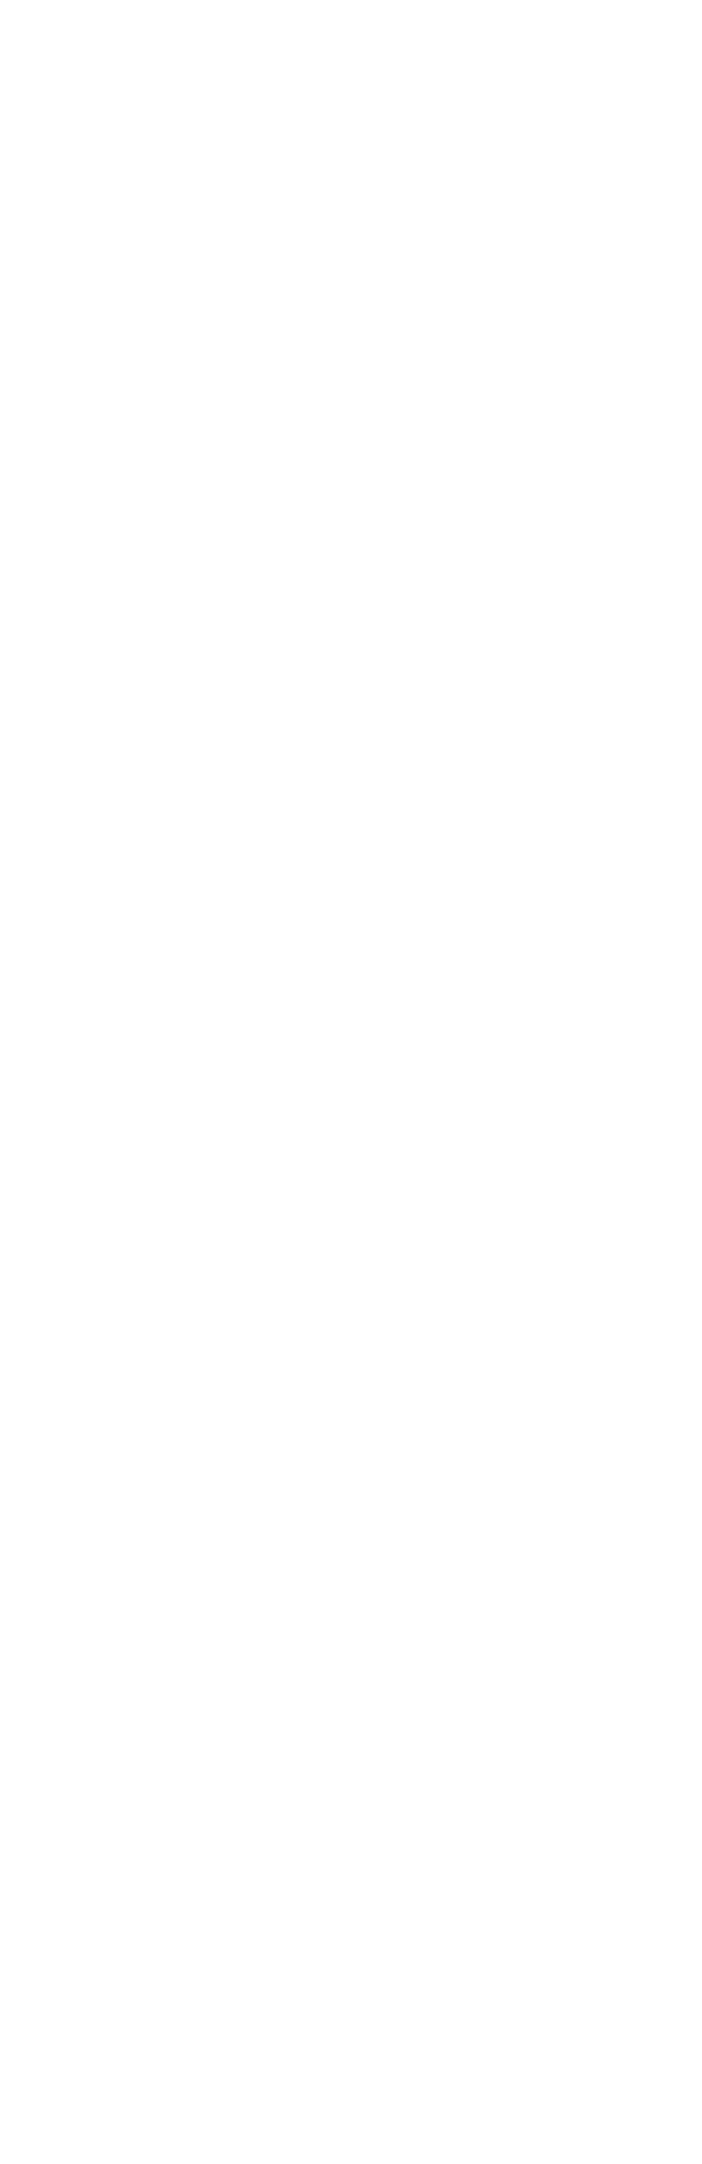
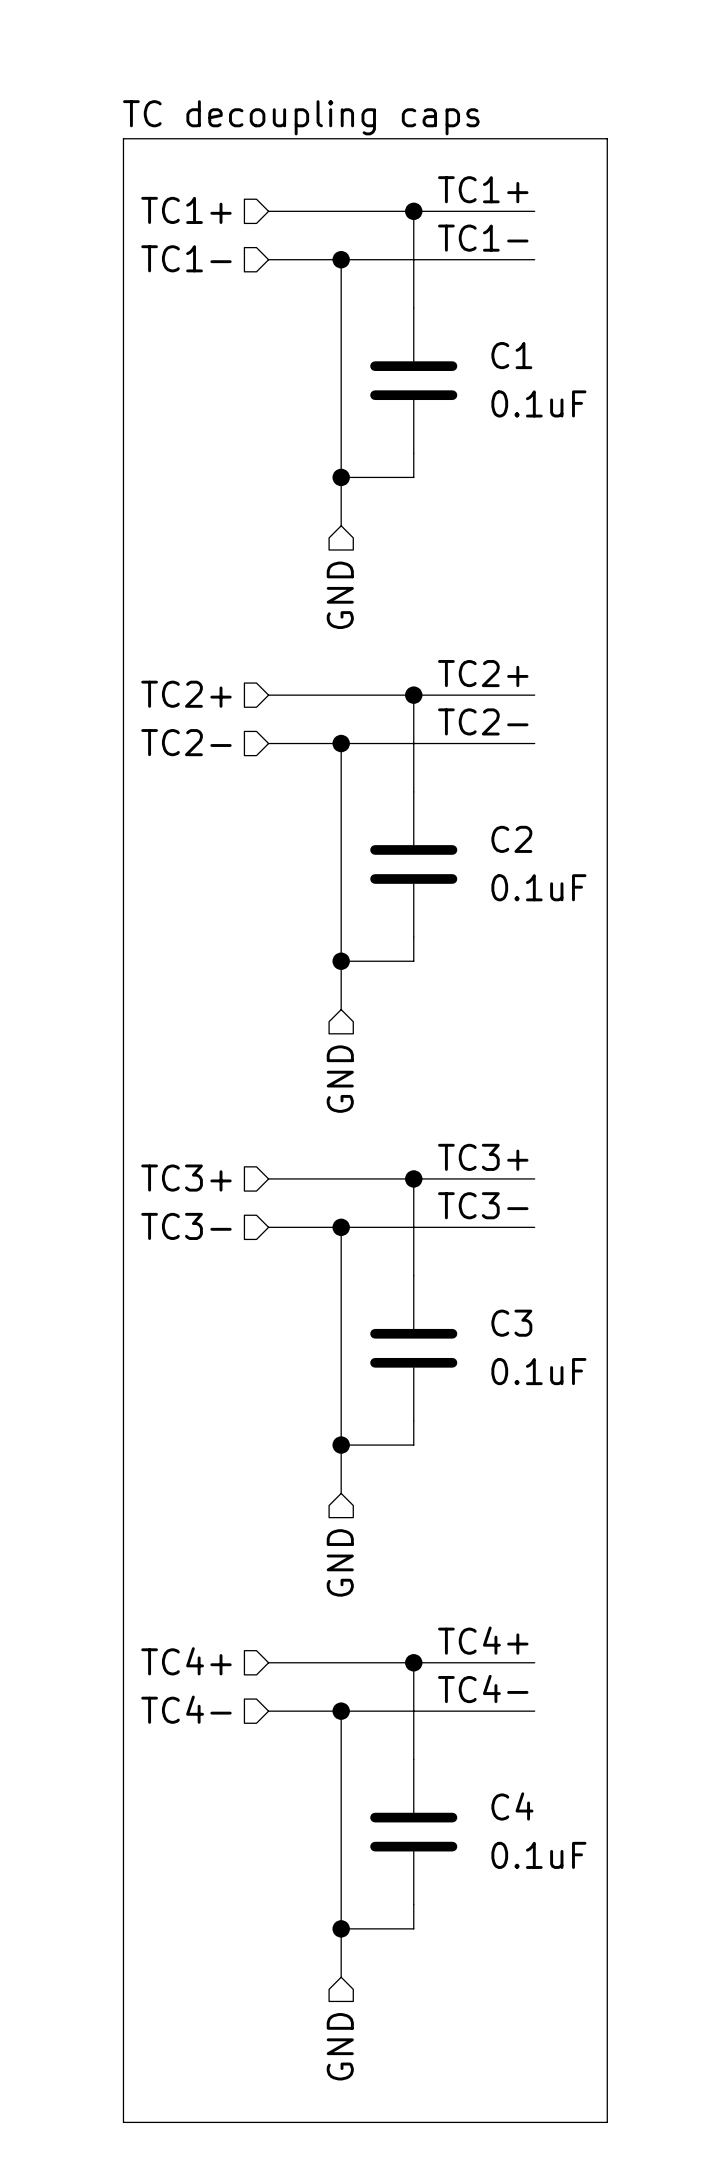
text: none -> TC decoupling caps (301, 117)
line: none -> (123, 138) (607, 138) (607, 2122) (123, 2122) (123, 138)
label: none -> TC1+ (483, 189)
hierarchical label: none -> TC1+ (186, 210)
wire: none -> (268, 211) (534, 211)
wire: none -> (413, 211) (413, 308)
junction: none -> (413, 211)
label: none -> TC1- (483, 238)
hierarchical label: none -> TC1- (186, 258)
wire: none -> (268, 259) (534, 259)
wire: none -> (341, 259) (341, 525)
junction: none -> (341, 259)
C1: none -> 0.1uF (413, 380)
wire: none -> (413, 453) (413, 477) (341, 477)
junction: none -> (341, 477)
hierarchical label: none -> GND (340, 595)
label: none -> TC2+ (483, 673)
hierarchical label: none -> TC2+ (186, 694)
wire: none -> (268, 695) (534, 695)
wire: none -> (413, 695) (413, 791)
junction: none -> (413, 695)
label: none -> TC2- (483, 721)
hierarchical label: none -> TC2- (186, 742)
wire: none -> (268, 743) (534, 743)
wire: none -> (341, 743) (341, 1009)
junction: none -> (341, 743)
C2: none -> 0.1uF (413, 864)
wire: none -> (413, 937) (413, 961) (341, 961)
junction: none -> (341, 961)
hierarchical label: none -> GND (340, 1079)
label: none -> TC3+ (483, 1157)
hierarchical label: none -> TC3+ (186, 1178)
wire: none -> (268, 1178) (534, 1178)
wire: none -> (413, 1178) (413, 1275)
junction: none -> (413, 1178)
label: none -> TC3- (483, 1205)
hierarchical label: none -> TC3- (186, 1226)
wire: none -> (268, 1227) (534, 1227)
wire: none -> (341, 1227) (341, 1493)
junction: none -> (341, 1227)
C3: none -> 0.1uF (413, 1348)
wire: none -> (413, 1420) (413, 1445) (341, 1445)
junction: none -> (341, 1445)
hierarchical label: none -> GND (340, 1562)
label: none -> TC4+ (483, 1640)
hierarchical label: none -> TC4+ (186, 1661)
wire: none -> (268, 1662) (534, 1662)
wire: none -> (413, 1662) (413, 1759)
junction: none -> (413, 1662)
label: none -> TC4- (483, 1688)
hierarchical label: none -> TC4- (186, 1709)
wire: none -> (268, 1711) (534, 1711)
wire: none -> (341, 1711) (341, 1977)
junction: none -> (341, 1711)
C4: none -> 0.1uF (413, 1832)
wire: none -> (413, 1904) (413, 1928) (341, 1928)
junction: none -> (341, 1928)
hierarchical label: none -> GND (340, 2046)

